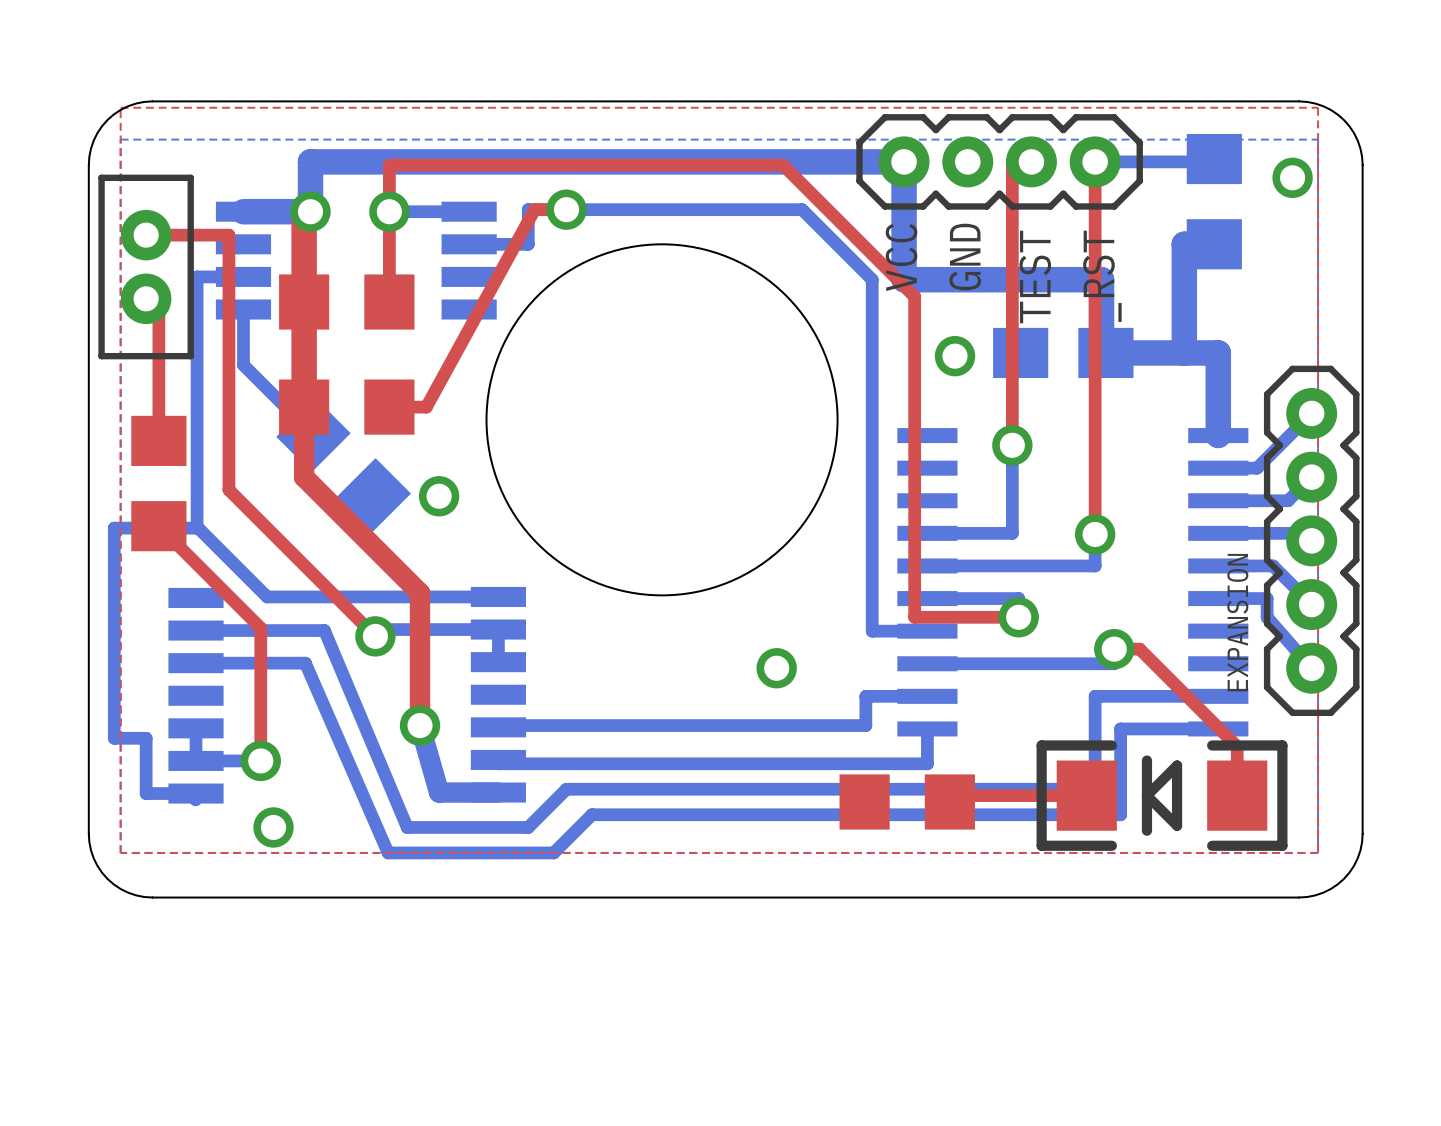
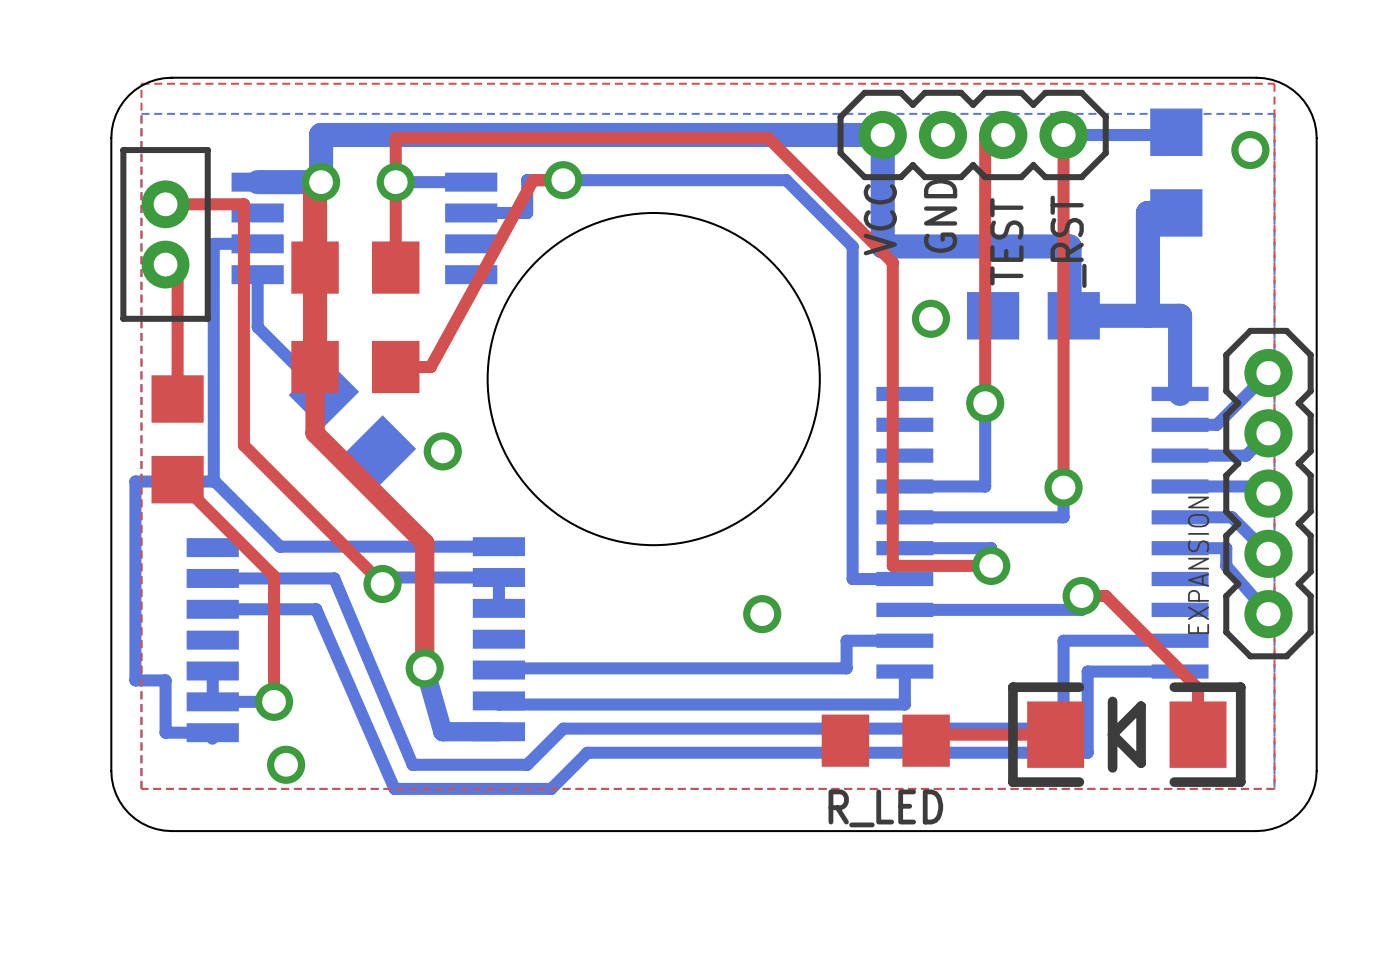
R_LED name: none -> R_LED (885, 808)

